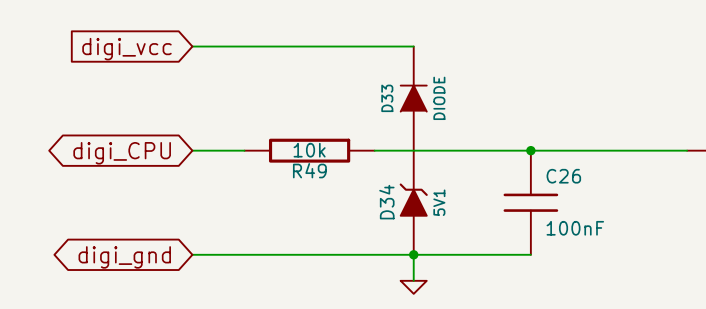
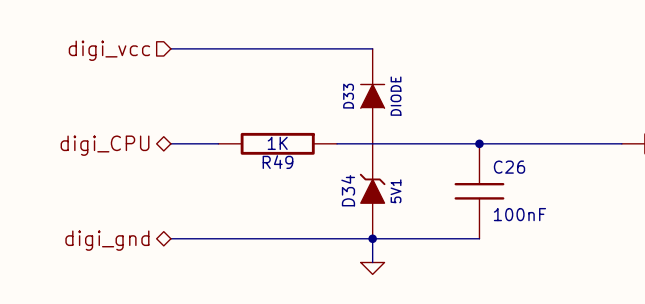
hierarchical label: none -> digi_vcc (109, 50)
global label: digi_vcc (126, 49) -> none
R49 value: 10k (309, 150) -> 1K (277, 143)
hierarchical label: none -> digi_CPU (105, 145)
global label: digi_CPU (122, 153) -> none
hierarchical label: none -> digi_gnd (107, 240)
global label: digi_gnd (124, 257) -> none

